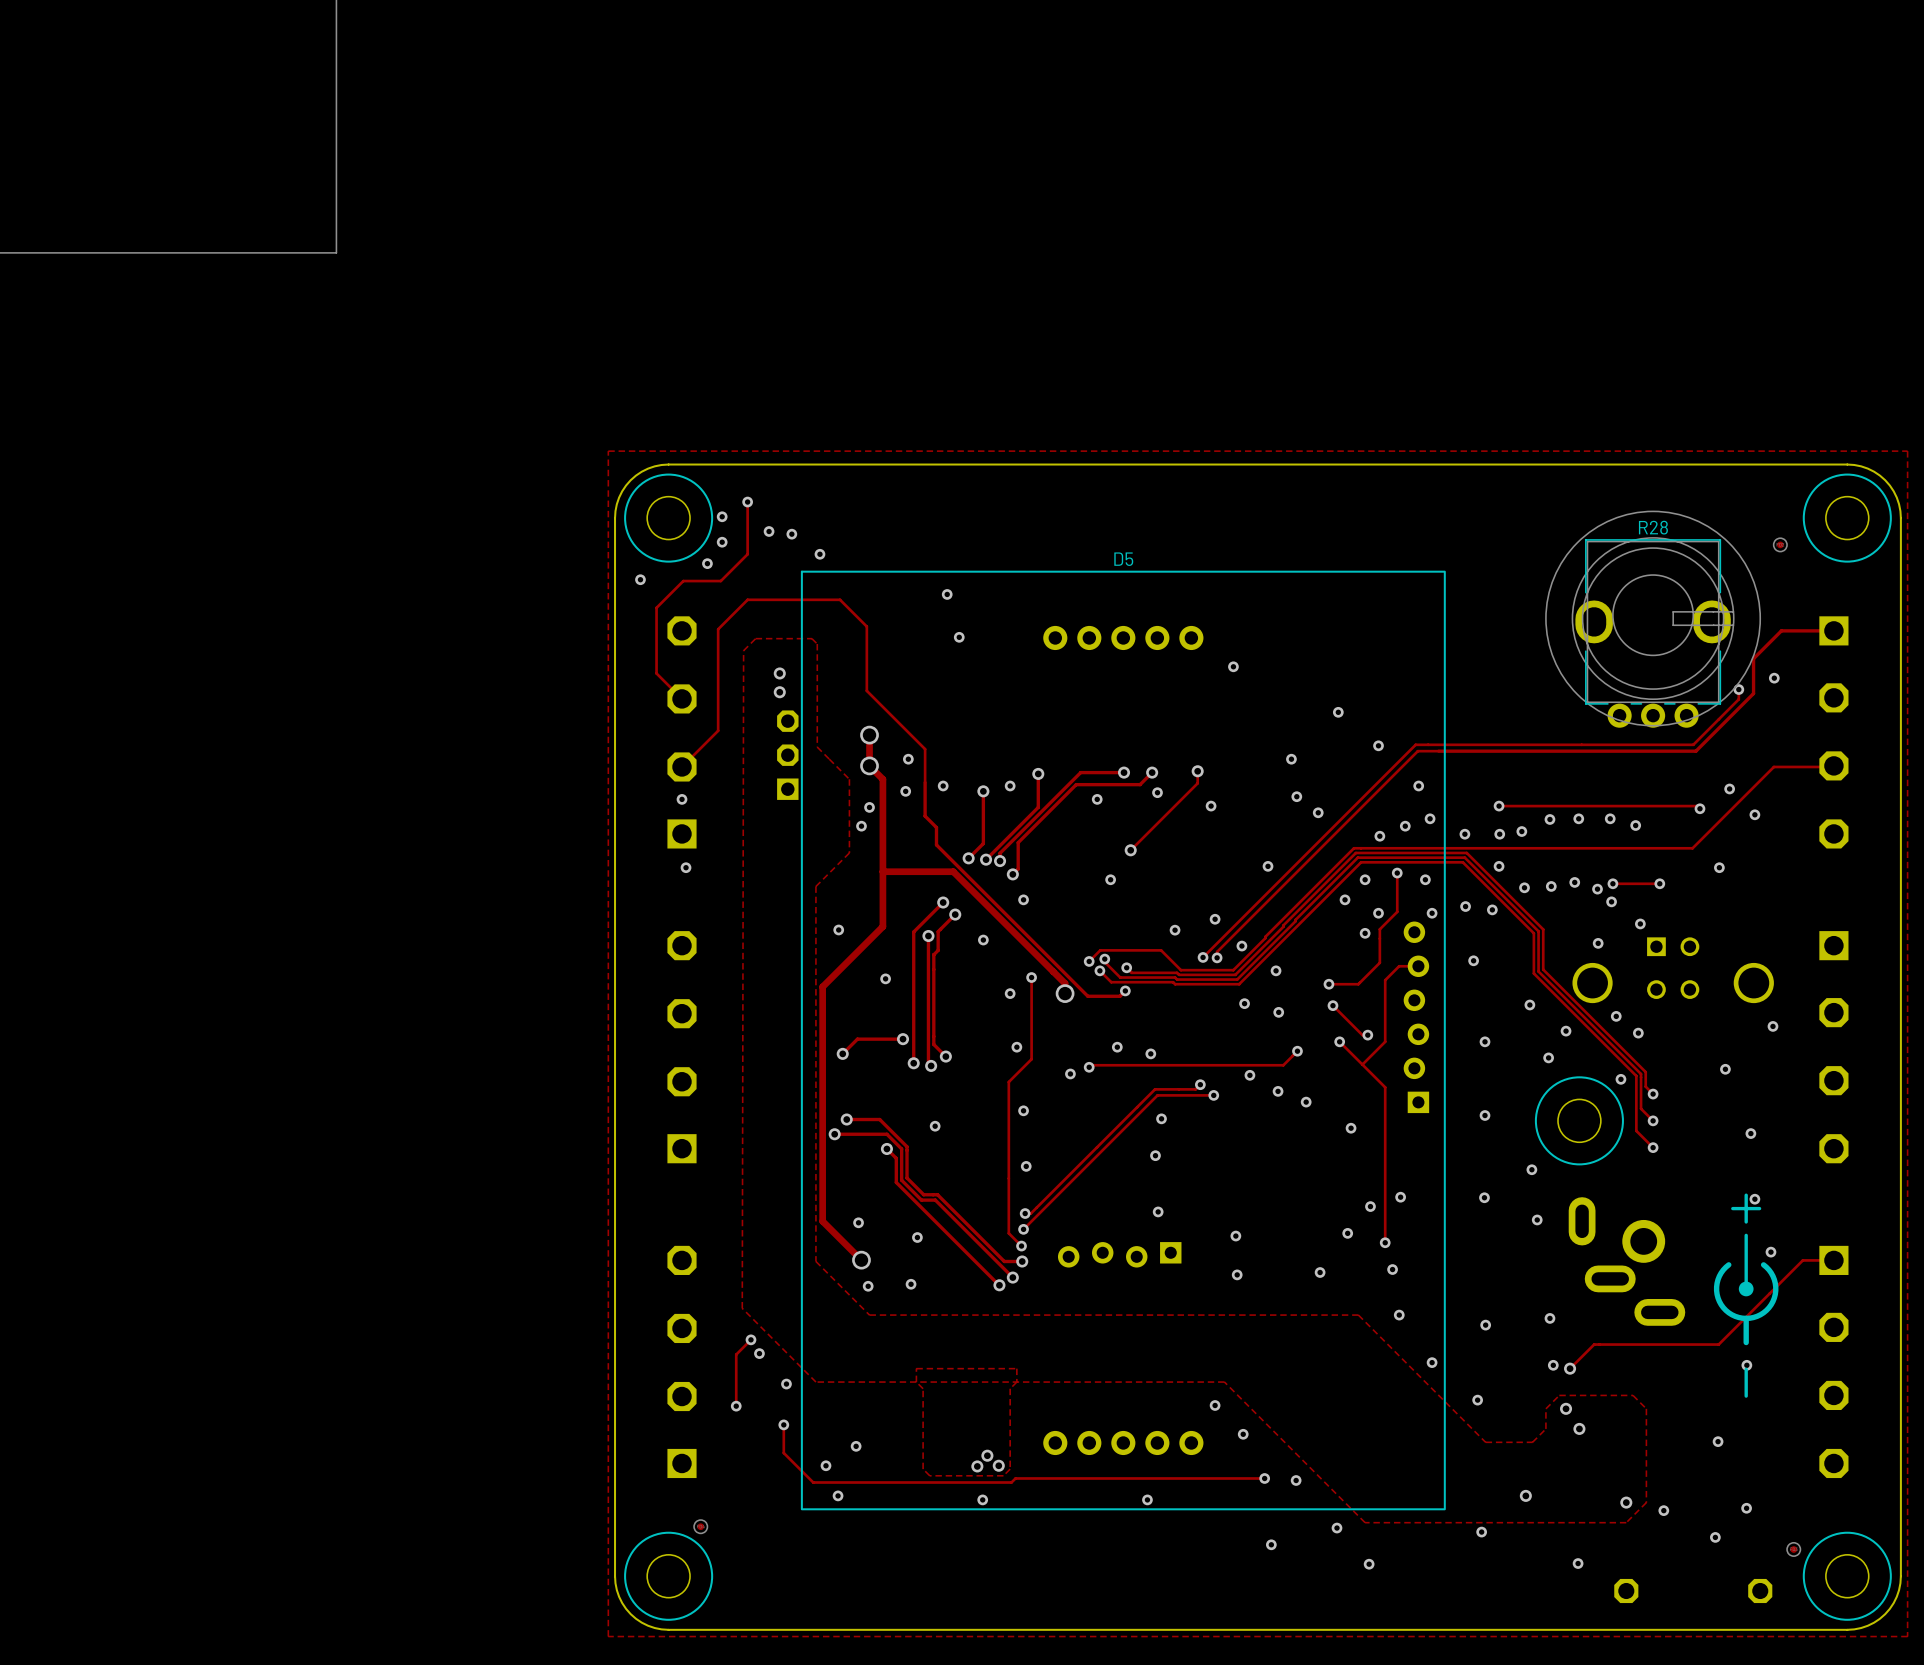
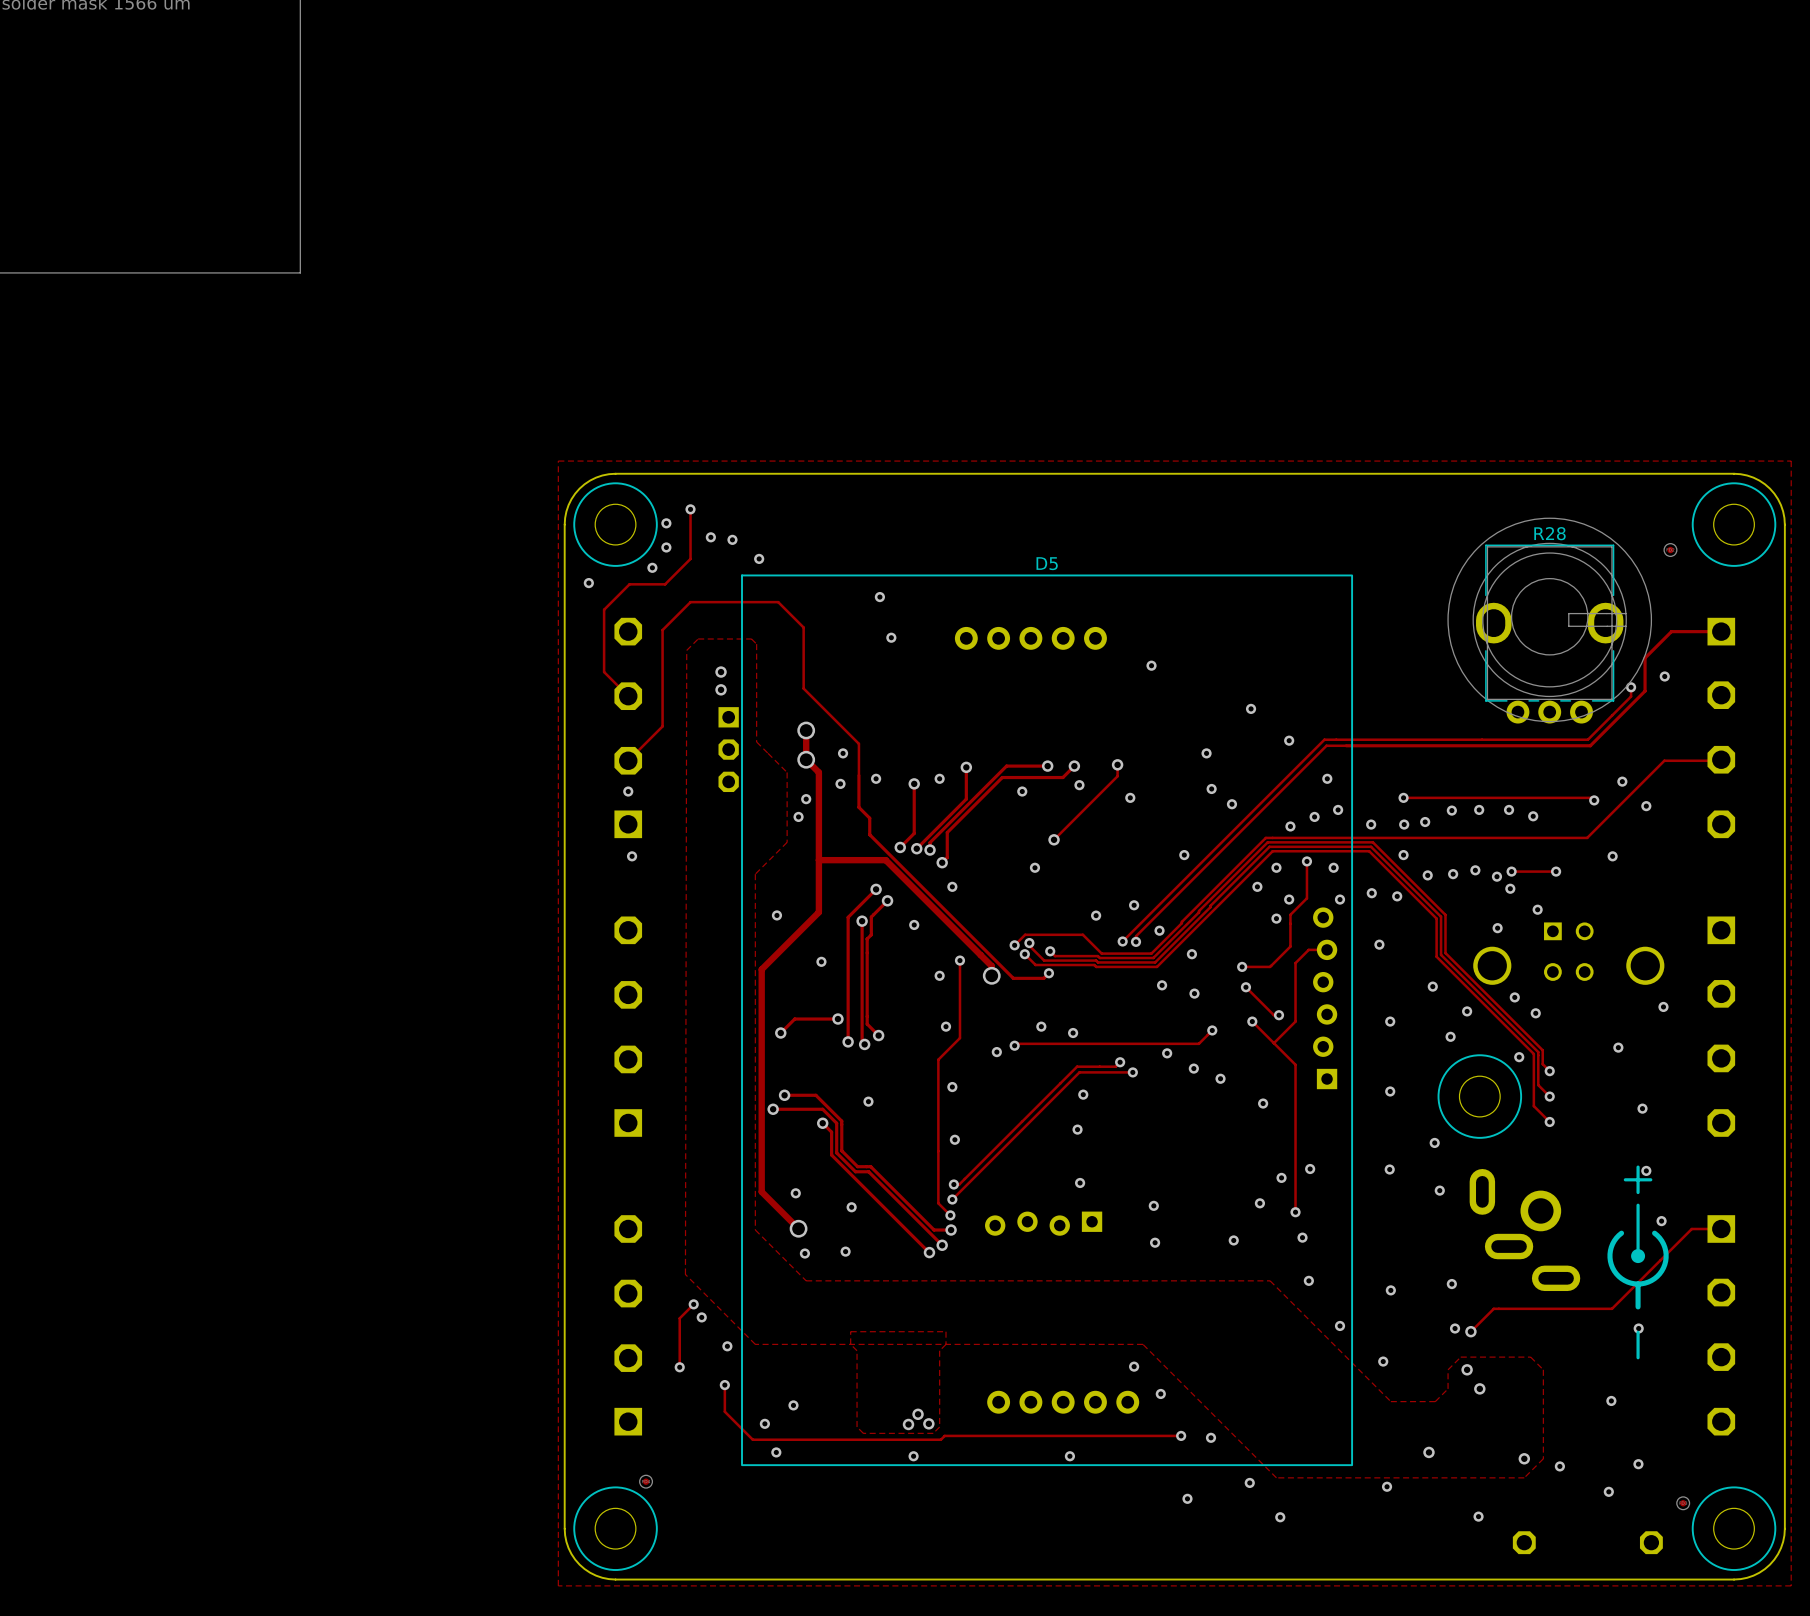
D5 footprint: [800, 570, 1446, 1511] -> [741, 574, 1354, 1467]
part rotation: 0° (787, 755) -> 180° (728, 749)

